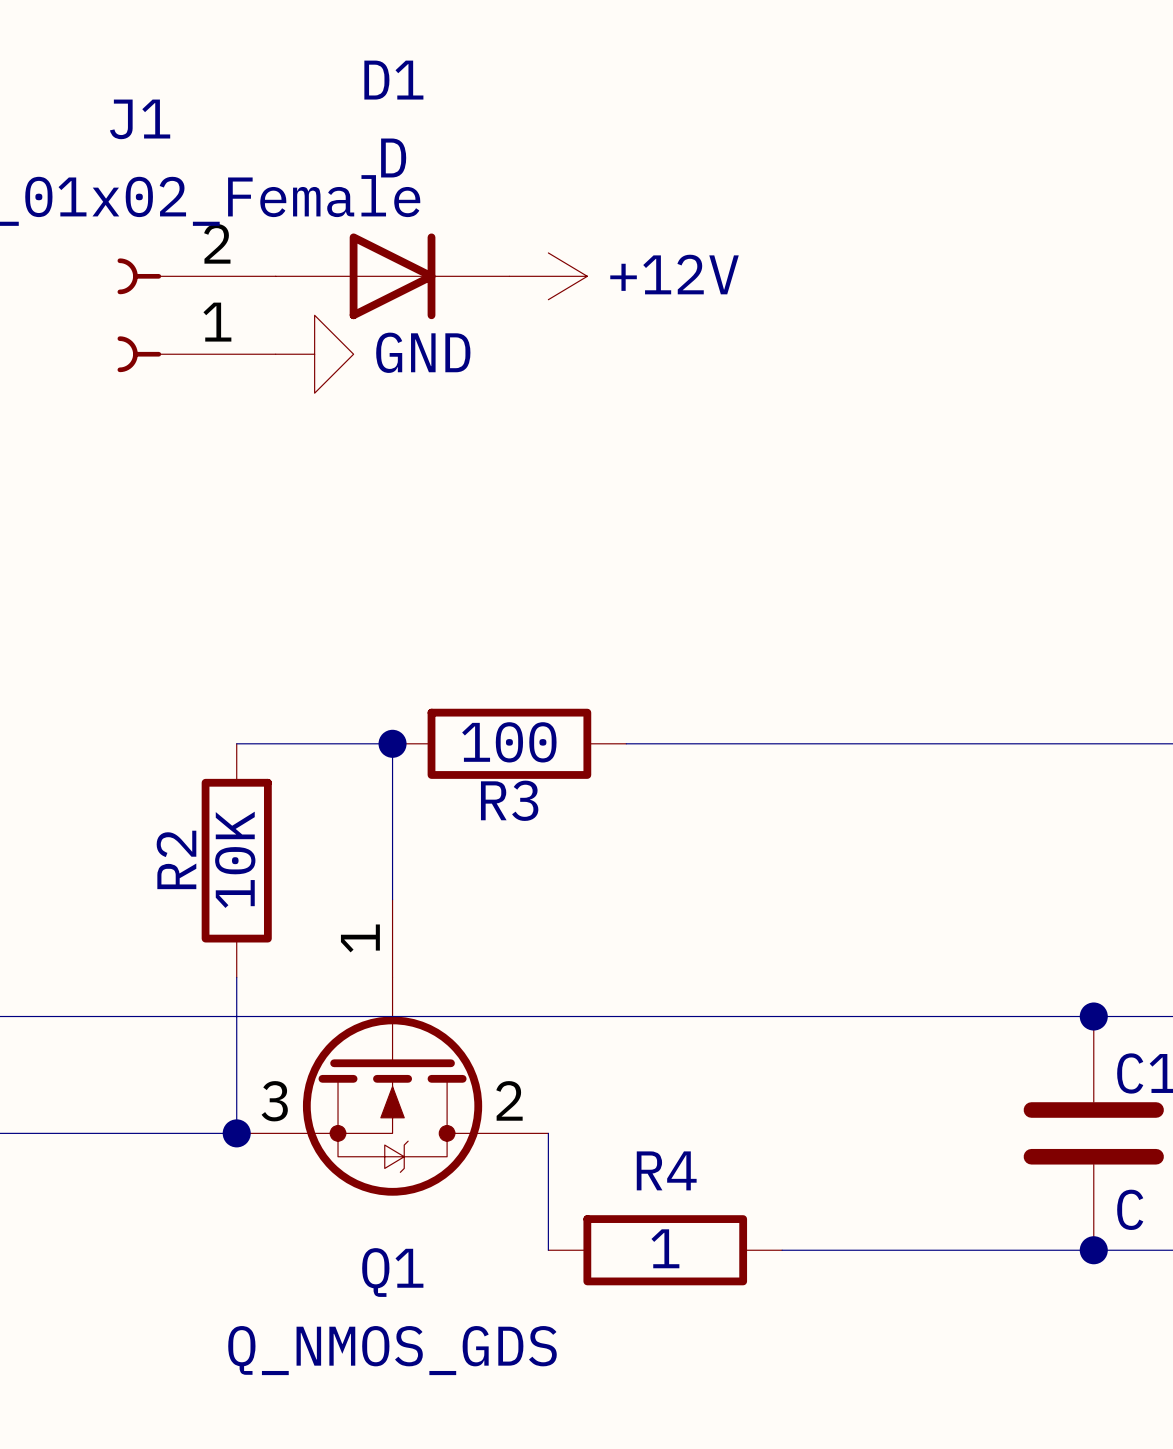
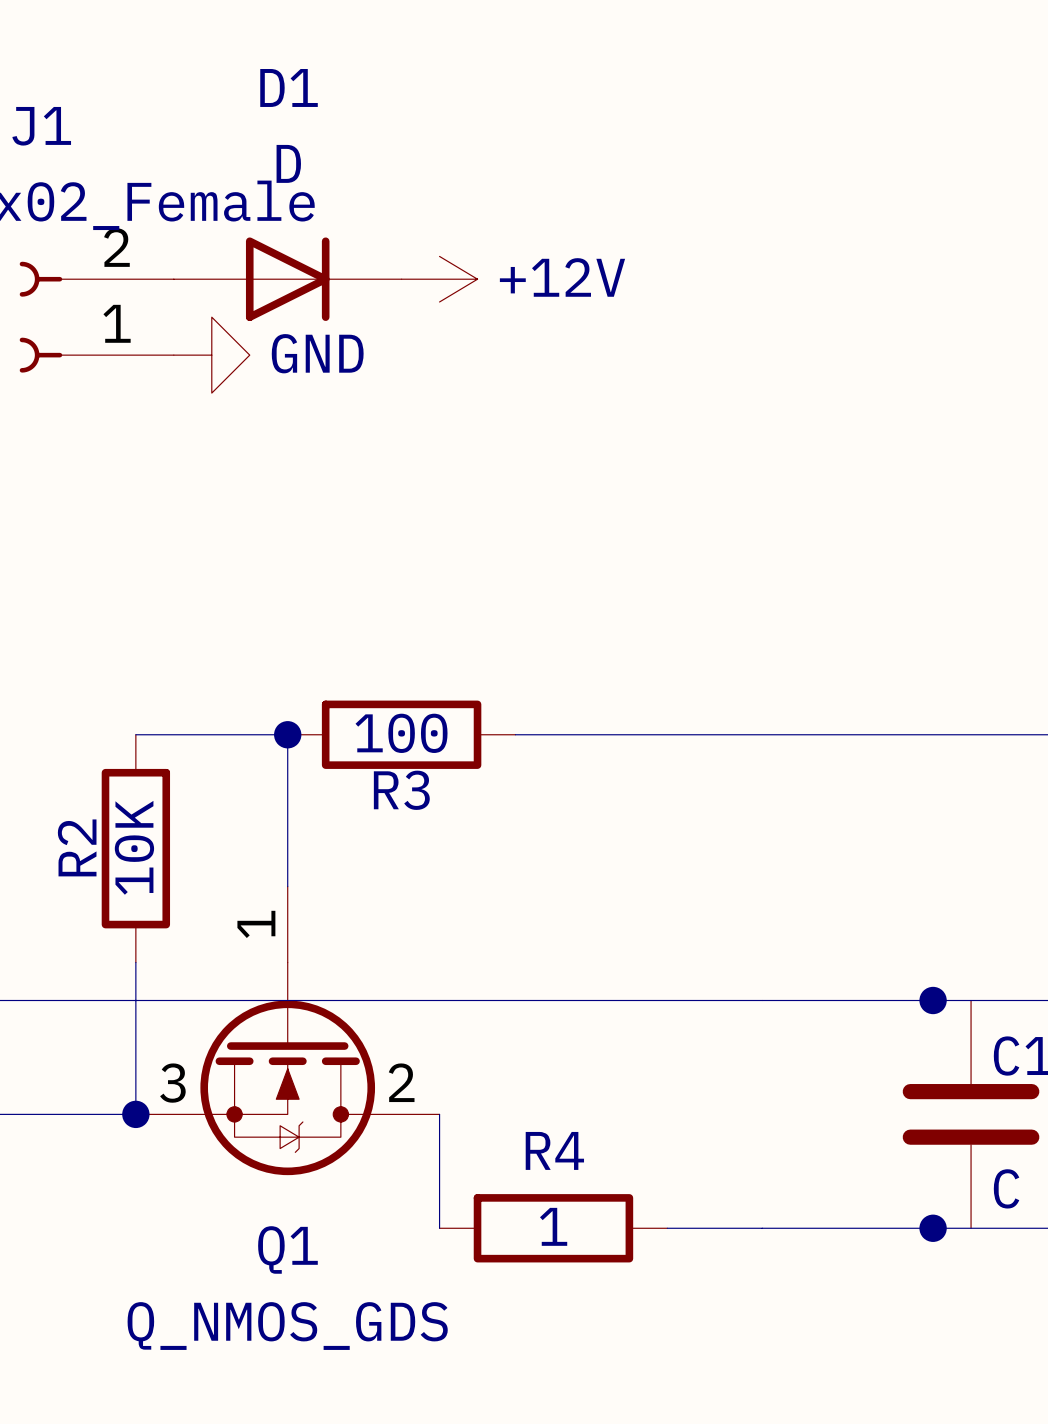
junction position: (1093, 1016) -> (933, 1000)
junction position: (1093, 1250) -> (933, 1228)

